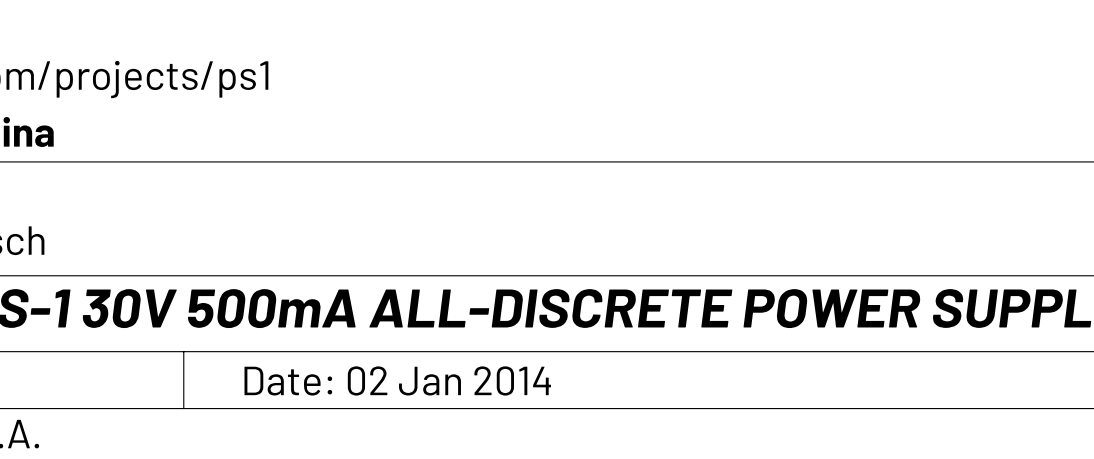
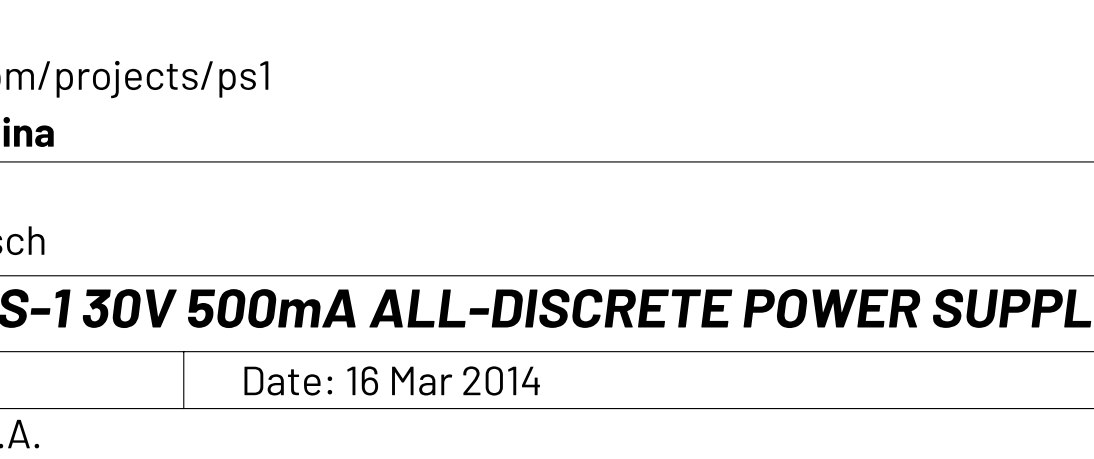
title block: Date: 02 Jan 2014 (397, 380) -> Date: 16 Mar 2014 (392, 380)

